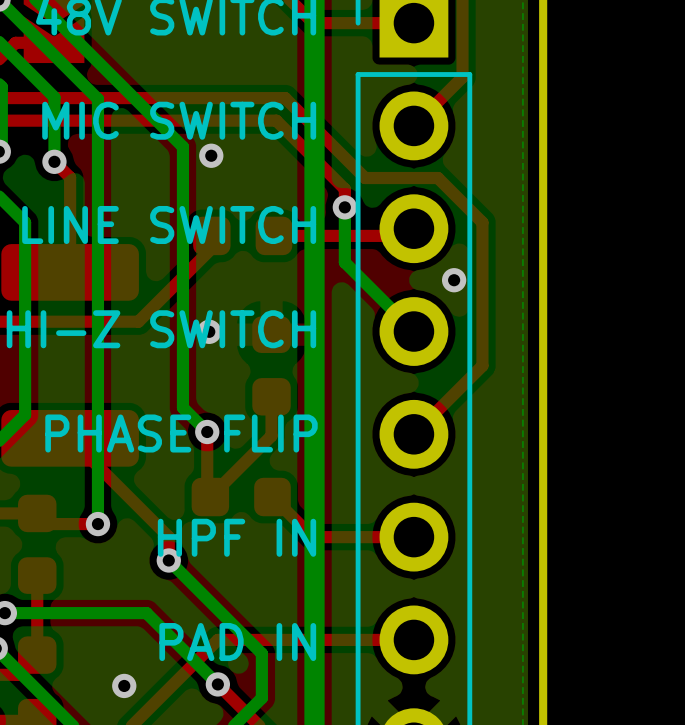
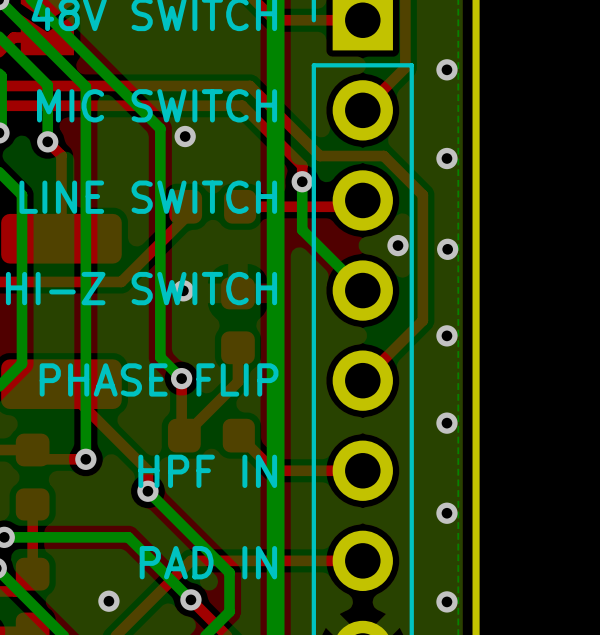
via: none -> (446, 69)
via: none -> (446, 158)
via: none -> (447, 249)
via: none -> (446, 335)
via: none -> (446, 423)
via: none -> (446, 513)
via: none -> (446, 601)

